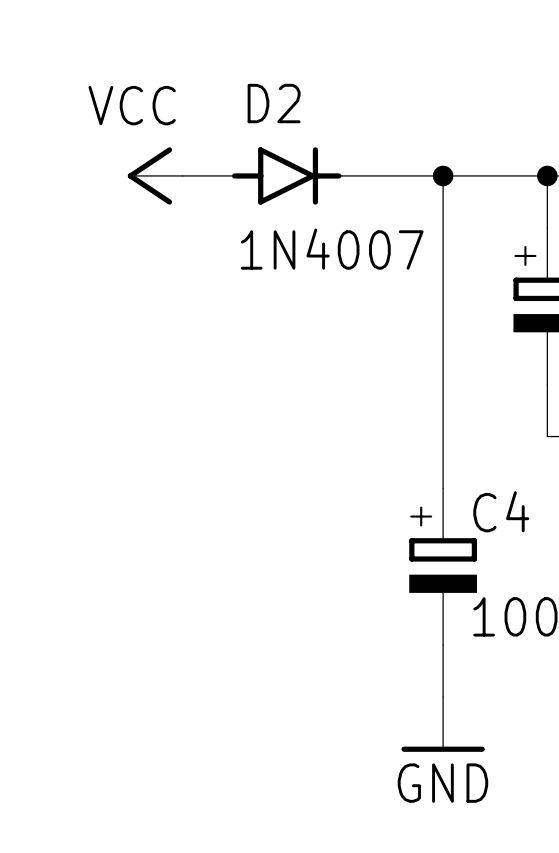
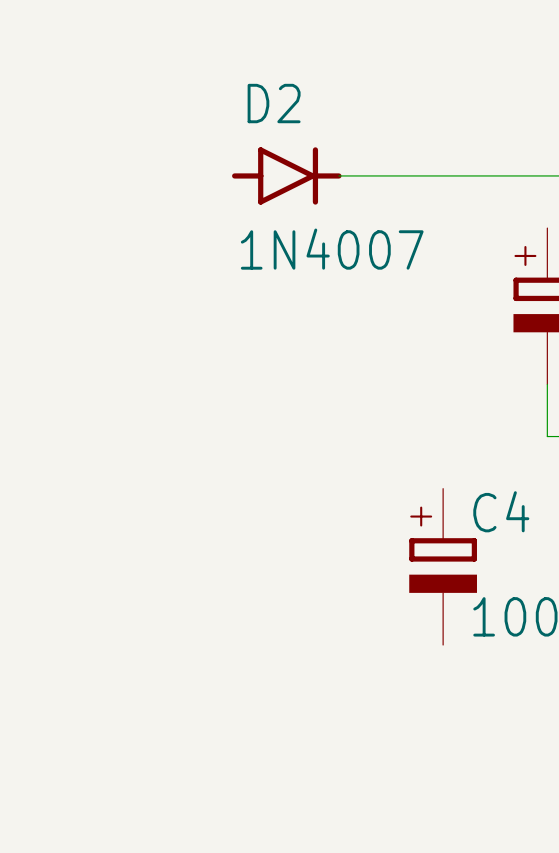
power symbol: VCC (155, 175) -> none
wire: (182, 175) (234, 175) -> none
wire: (443, 175) (443, 488) -> none
junction: (443, 175) -> none
wire: (547, 175) (547, 228) -> none
junction: (547, 175) -> none
wire: (443, 645) (443, 697) -> none
power symbol: GND (443, 724) -> none

